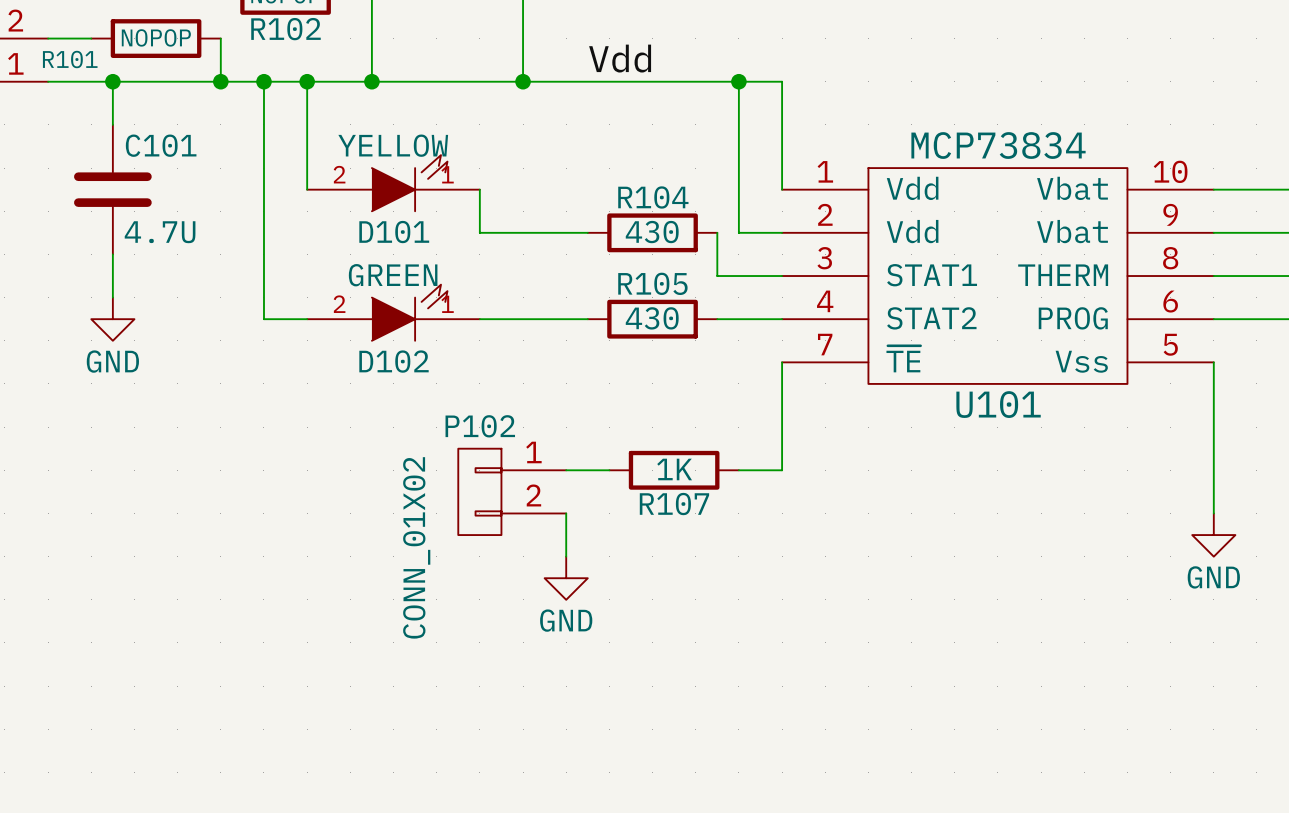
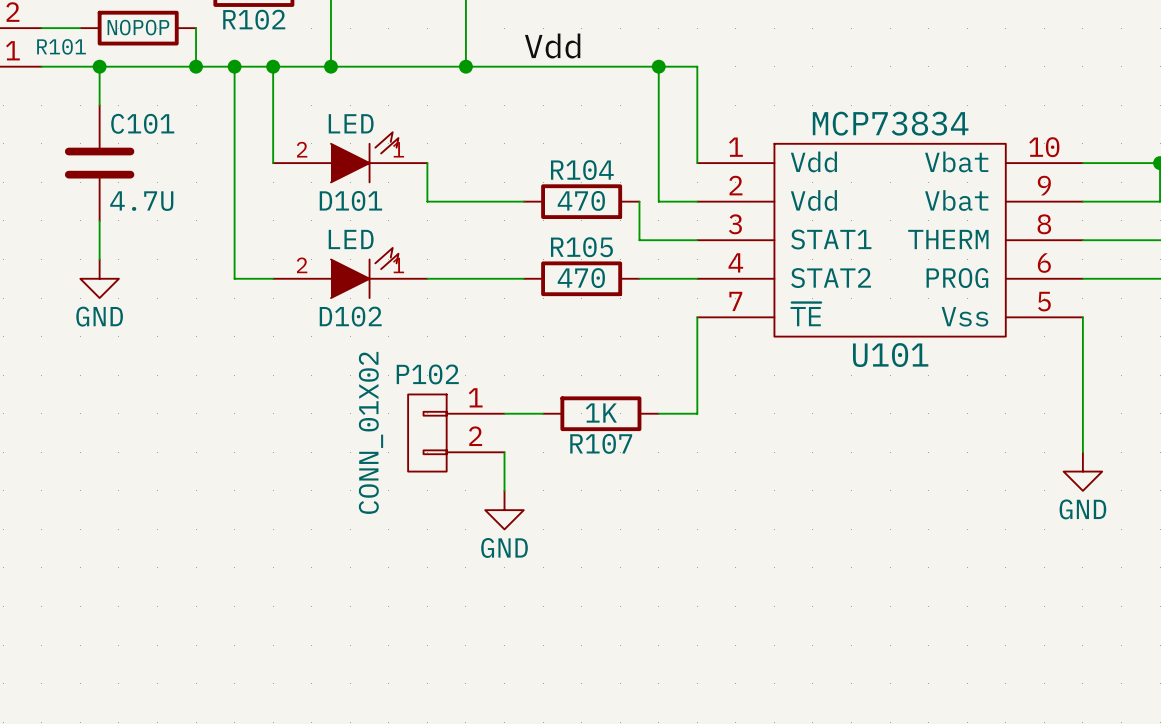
D101 value: YELLOW (393, 145) -> LED (351, 123)
R104 value: 430 (652, 232) -> 470 (581, 200)
D102 value: GREEN (393, 275) -> LED (351, 239)
R105 value: 430 (652, 318) -> 470 (581, 278)
P102 value position: CONN_01X02 (416, 547) -> CONN_01X02 (370, 432)

